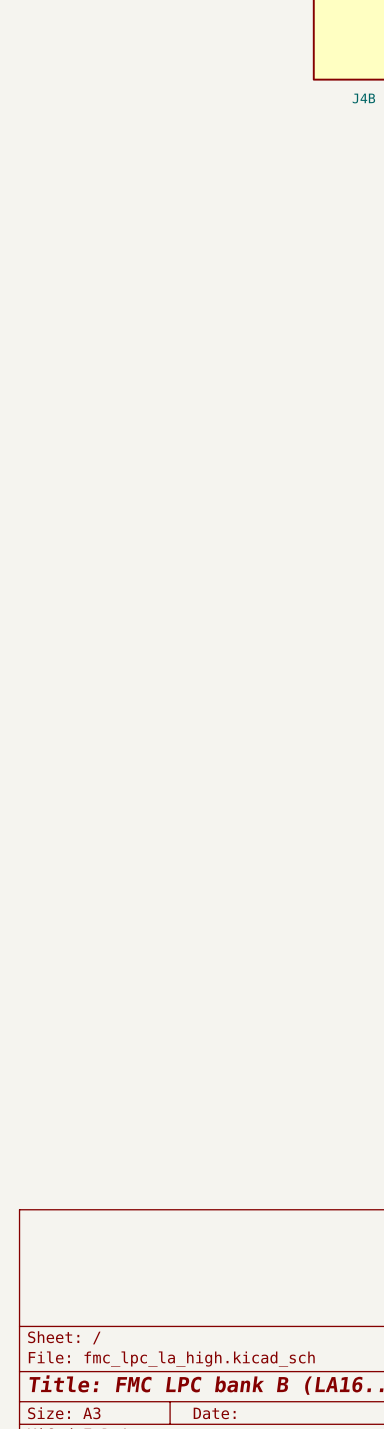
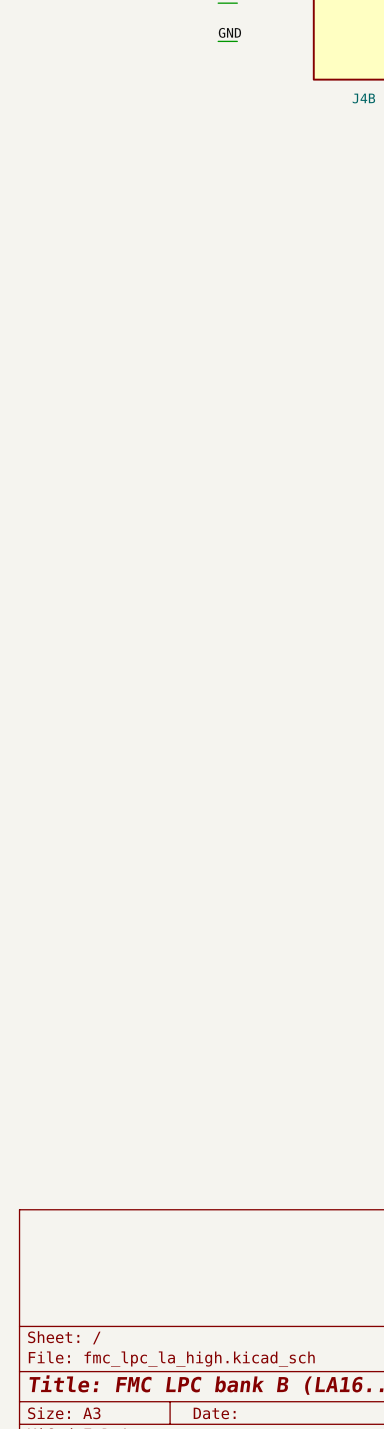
wire: none -> (218, 3) (237, 3)
label: none -> GND (229, 32)
wire: none -> (218, 41) (237, 41)

